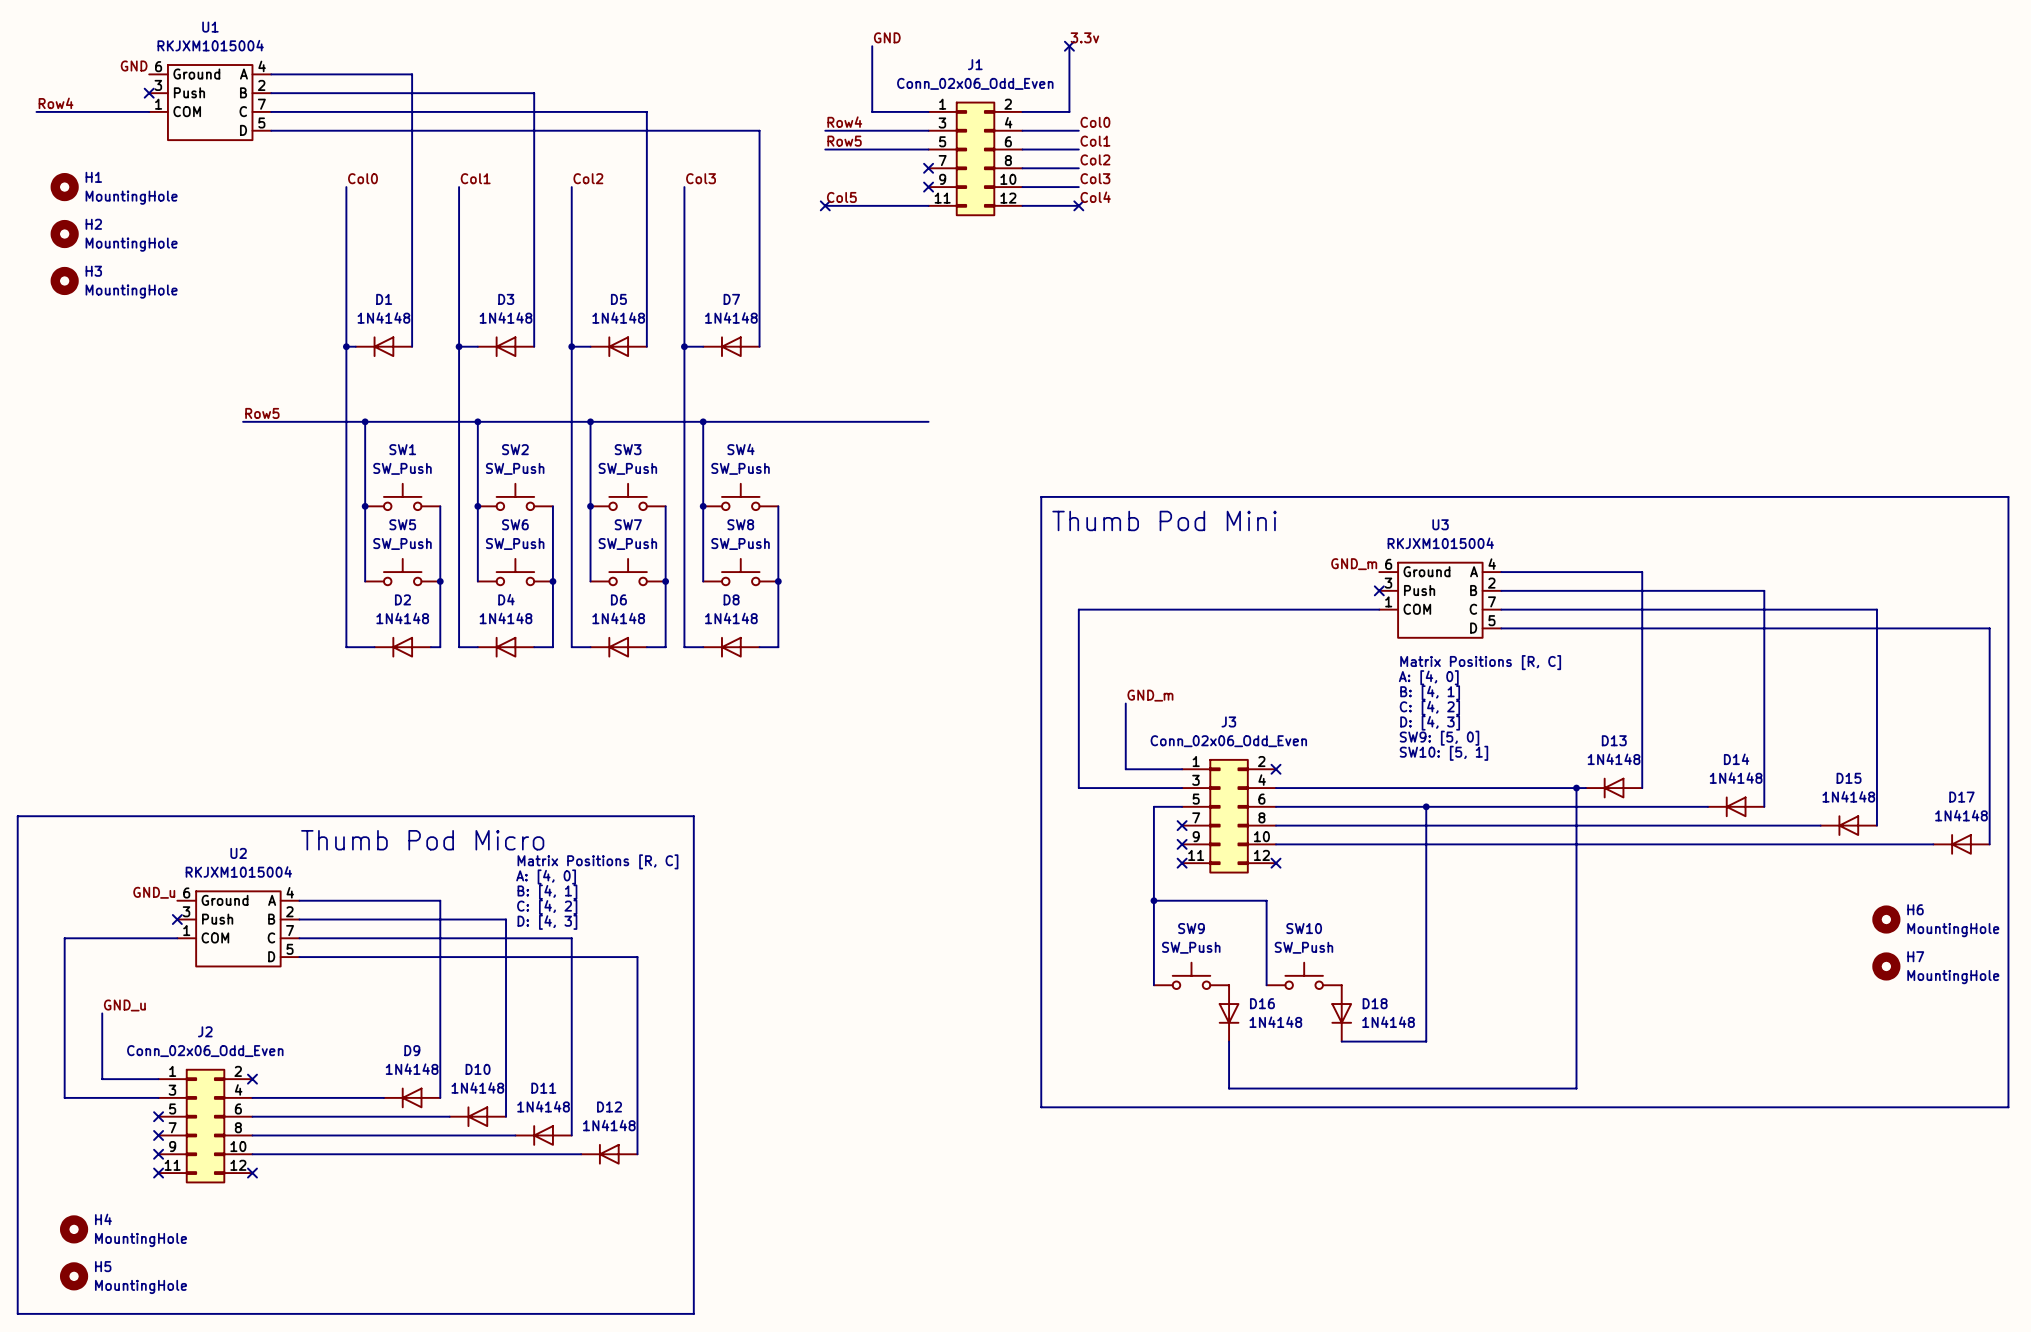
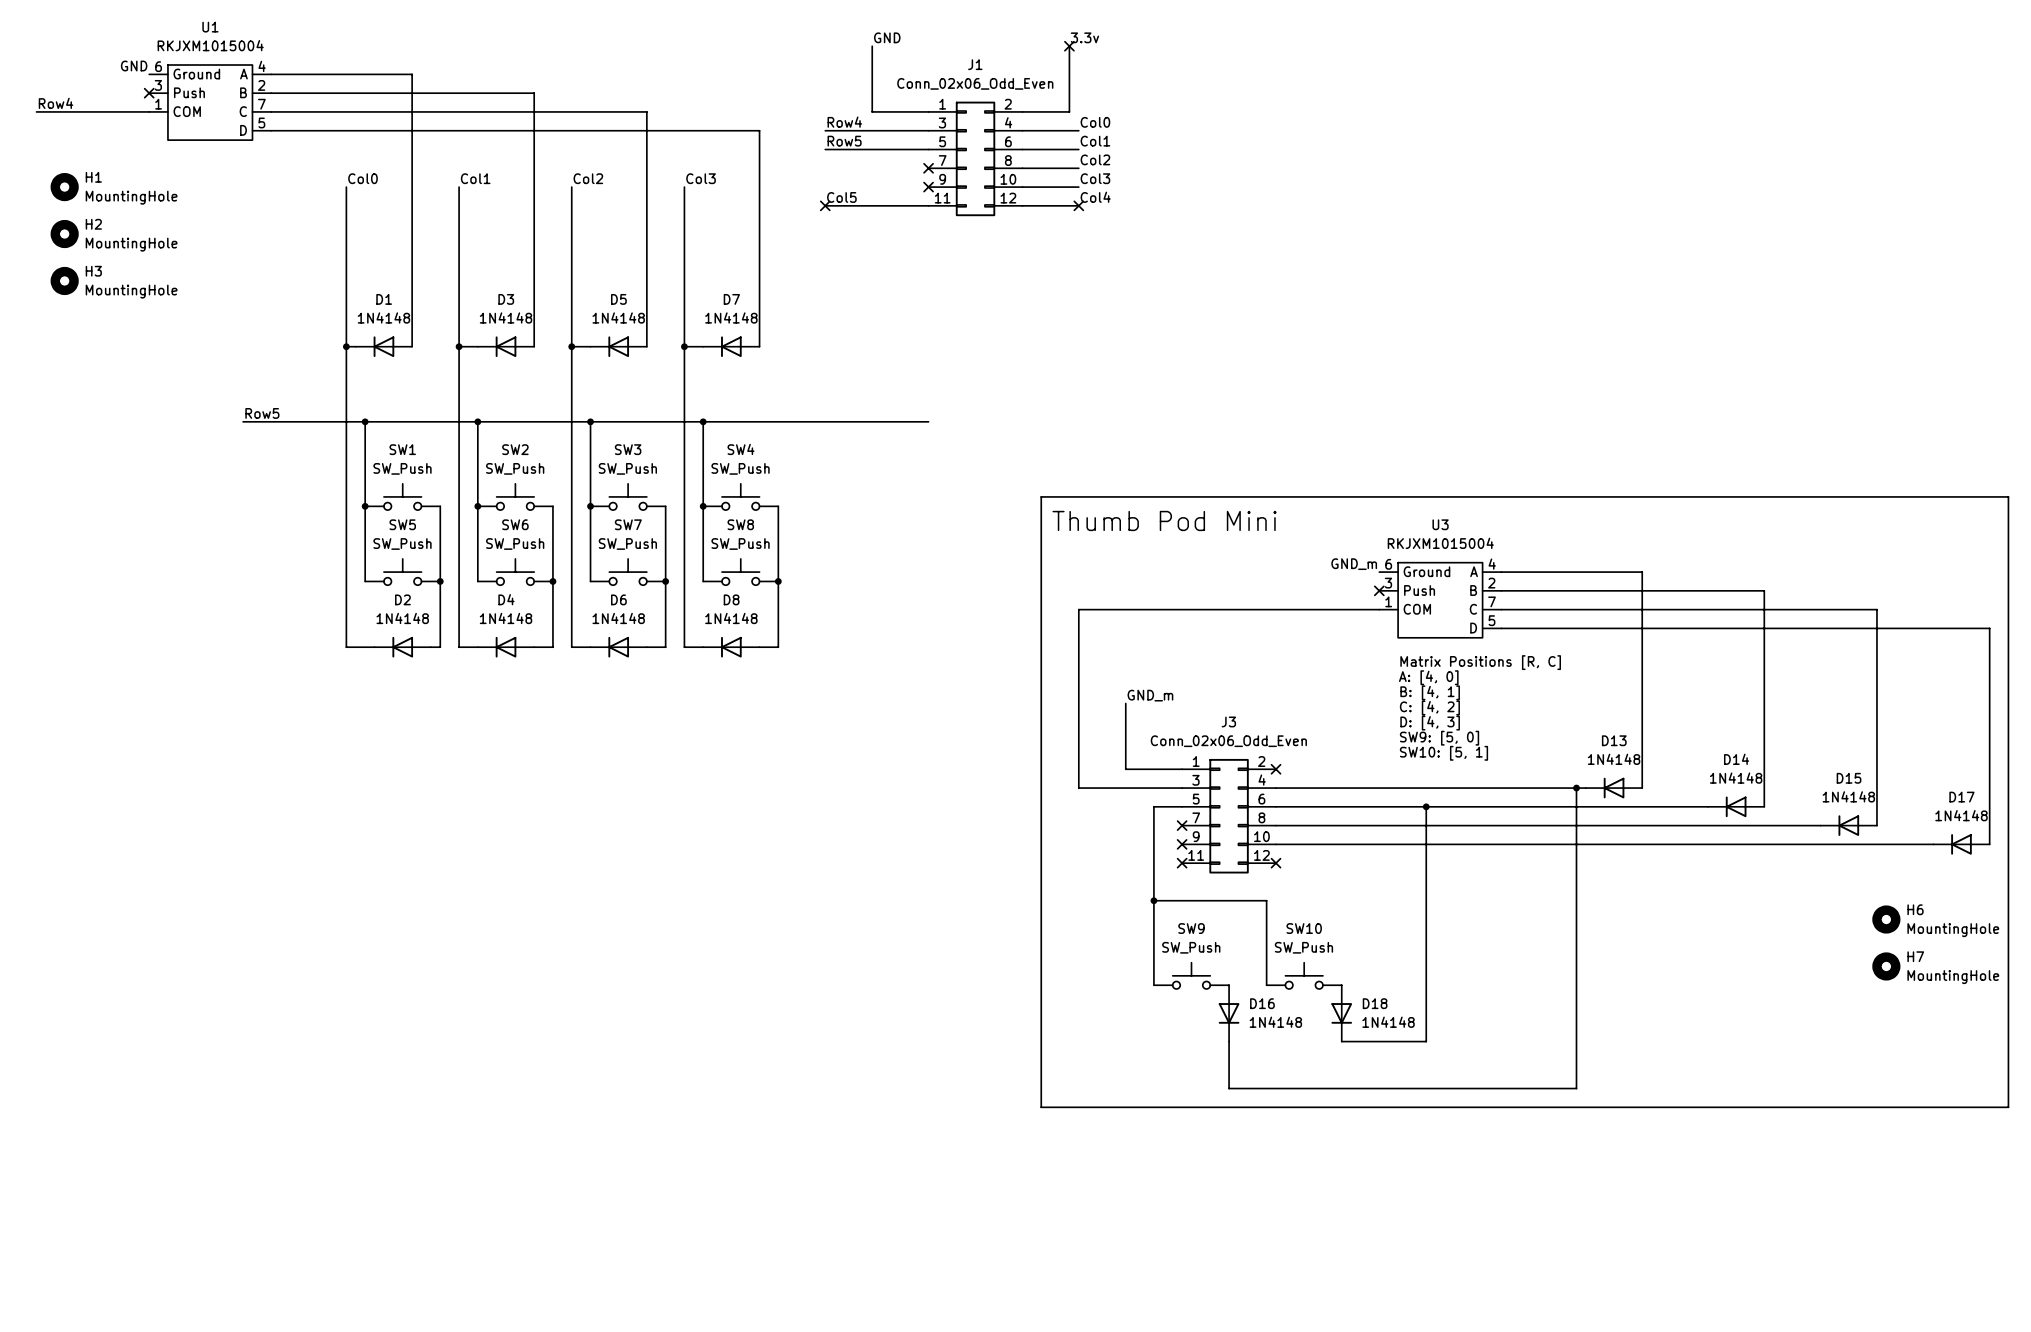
line: (17, 816) (17, 1313) (693, 1313) (693, 816) (17, 816) -> none
text: Thumb Pod Micro (422, 840) -> none
text: Matrix Positions [R, C] (597, 861) -> none
text: A: [4, 0] (546, 876) -> none
label: GND_u (154, 892) -> none
text: B: [4, 1] (547, 892) -> none
wire: (299, 900) (440, 900) (440, 1097) -> none
text: C: [4, 2] (547, 907) -> none
no-connect mark: (177, 919) -> none
wire: (299, 919) (506, 919) (506, 1116) -> none
text: D: [4, 3] (547, 922) -> none
U2: RKJXM1015004 (238, 928) -> none
wire: (177, 938) (64, 938) (64, 1097) (158, 1097) -> none
wire: (299, 938) (571, 938) (571, 1135) -> none
wire: (299, 957) (637, 957) (637, 1154) -> none
label: GND_u (124, 1005) -> none
wire: (102, 1013) (102, 1079) (158, 1079) -> none
no-connect mark: (252, 1079) -> none
wire: (252, 1097) (383, 1097) -> none
D9: 1N4148 (412, 1097) -> none
no-connect mark: (158, 1116) -> none
wire: (252, 1116) (449, 1116) -> none
D10: 1N4148 (477, 1116) -> none
J2: Conn_02x06_Odd_Even (205, 1126) -> none
no-connect mark: (158, 1135) -> none
wire: (252, 1135) (515, 1135) -> none
D11: 1N4148 (543, 1135) -> none
no-connect mark: (158, 1154) -> none
wire: (252, 1154) (581, 1154) -> none
D12: 1N4148 (609, 1154) -> none
no-connect mark: (158, 1173) -> none
no-connect mark: (252, 1173) -> none
H4: MountingHole (74, 1229) -> none
H5: MountingHole (74, 1276) -> none

